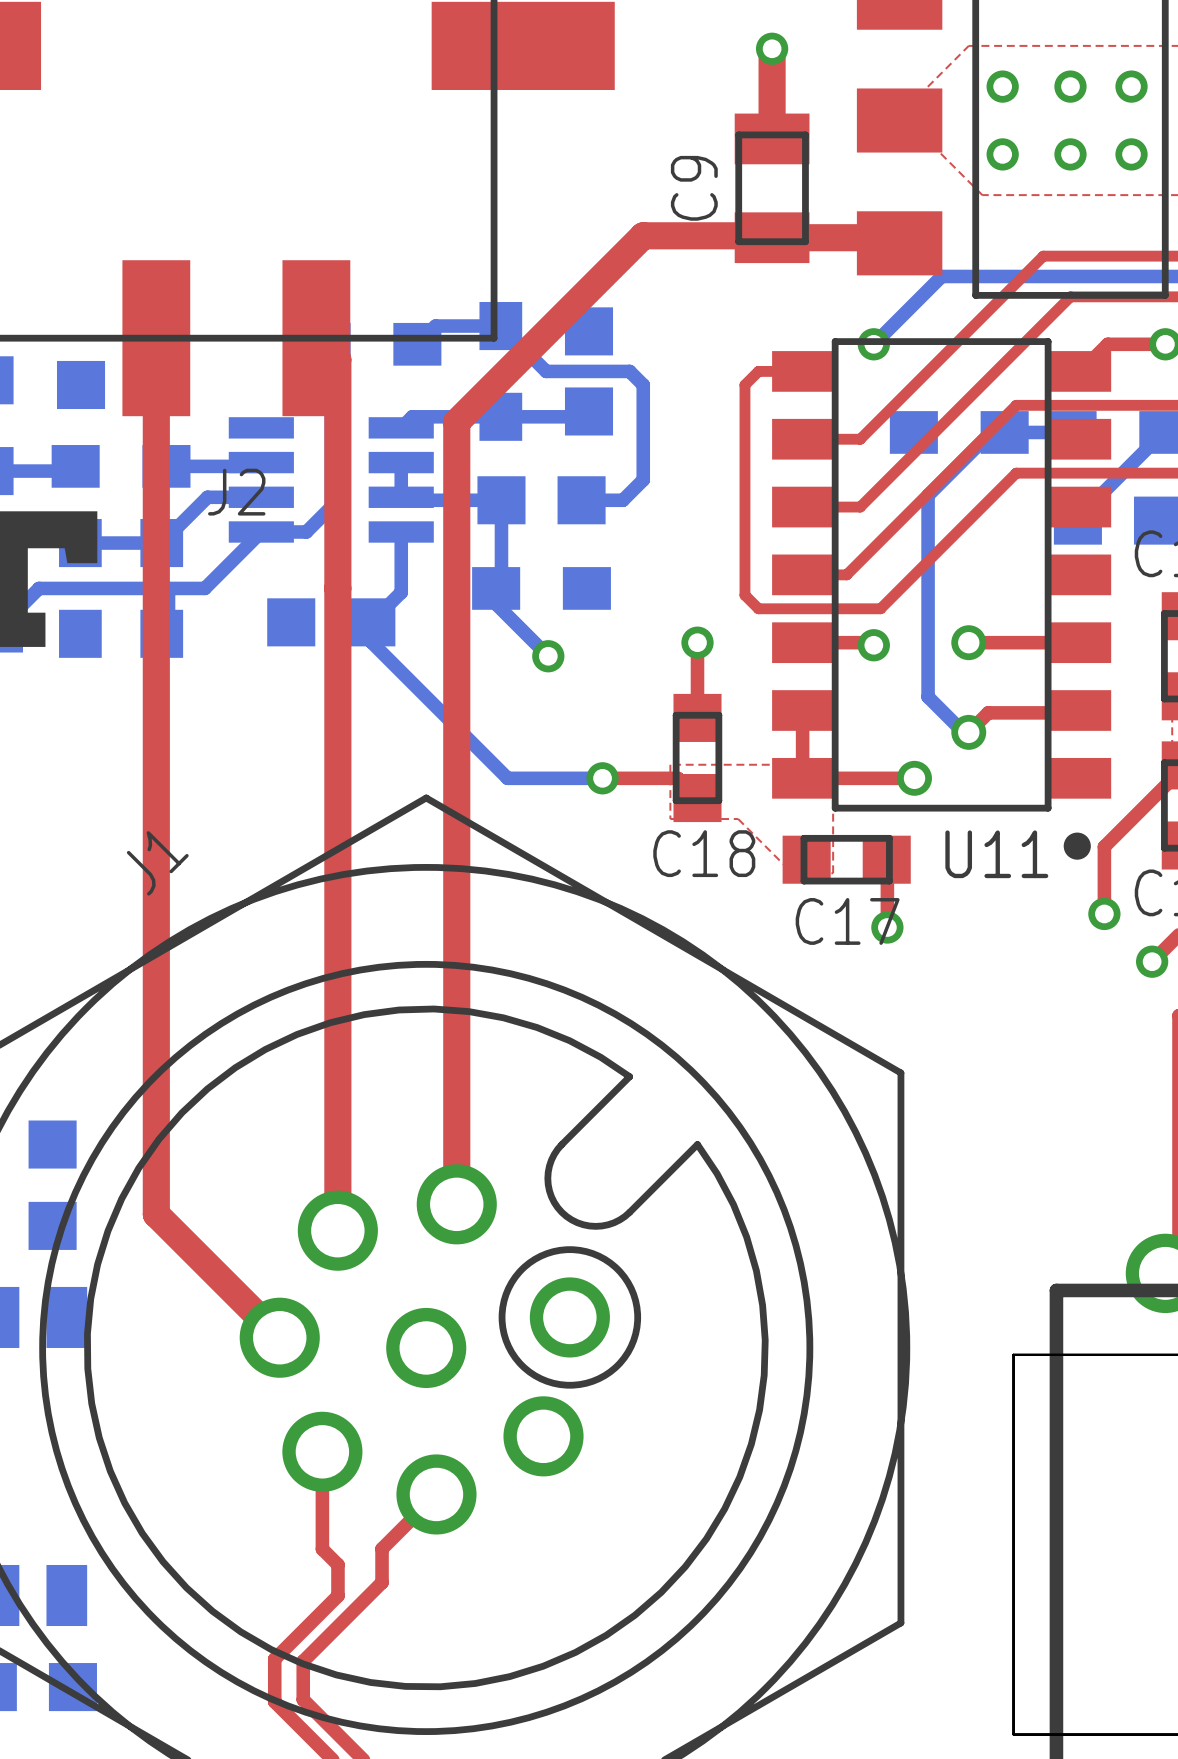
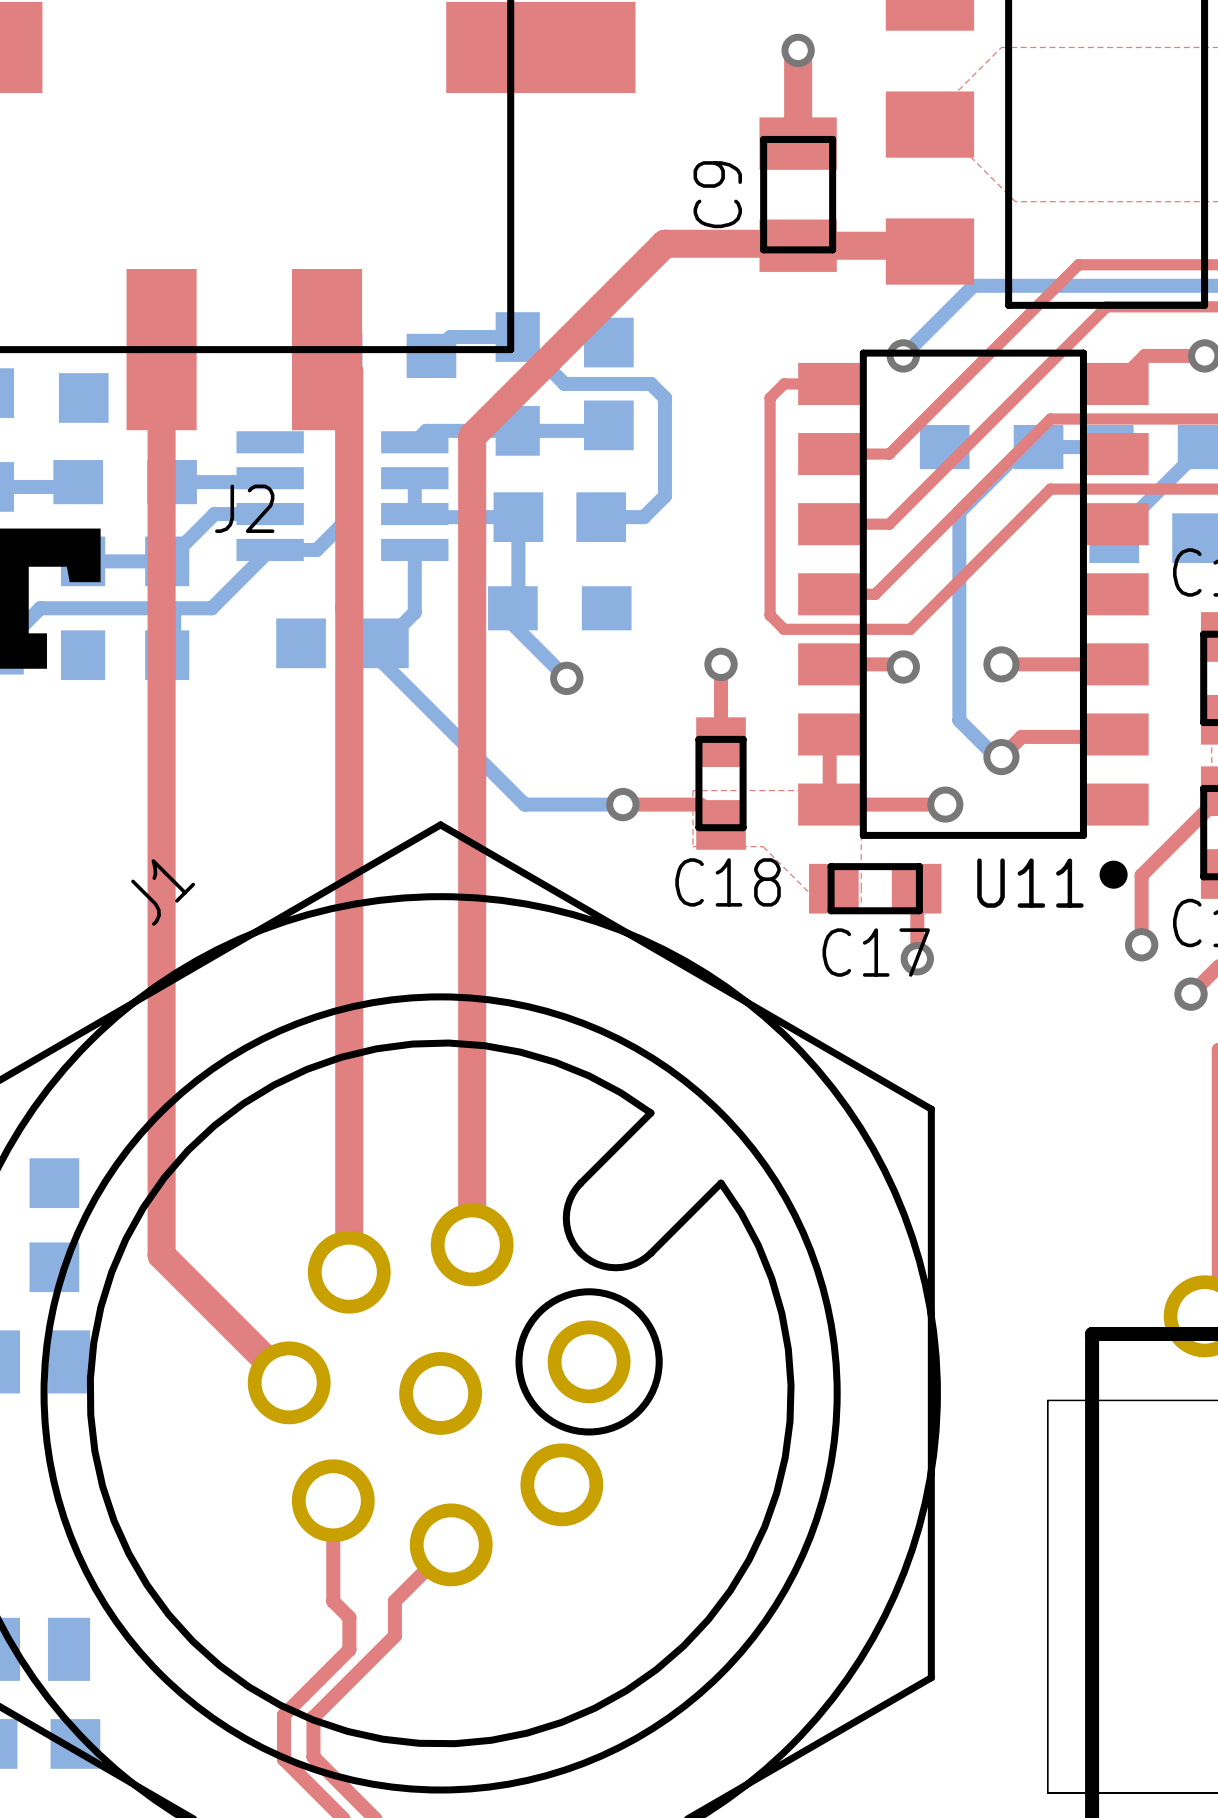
via: (1002, 86) -> none
via: (1070, 86) -> none
via: (1131, 86) -> none
via: (1002, 154) -> none
via: (1070, 154) -> none
via: (1131, 154) -> none

